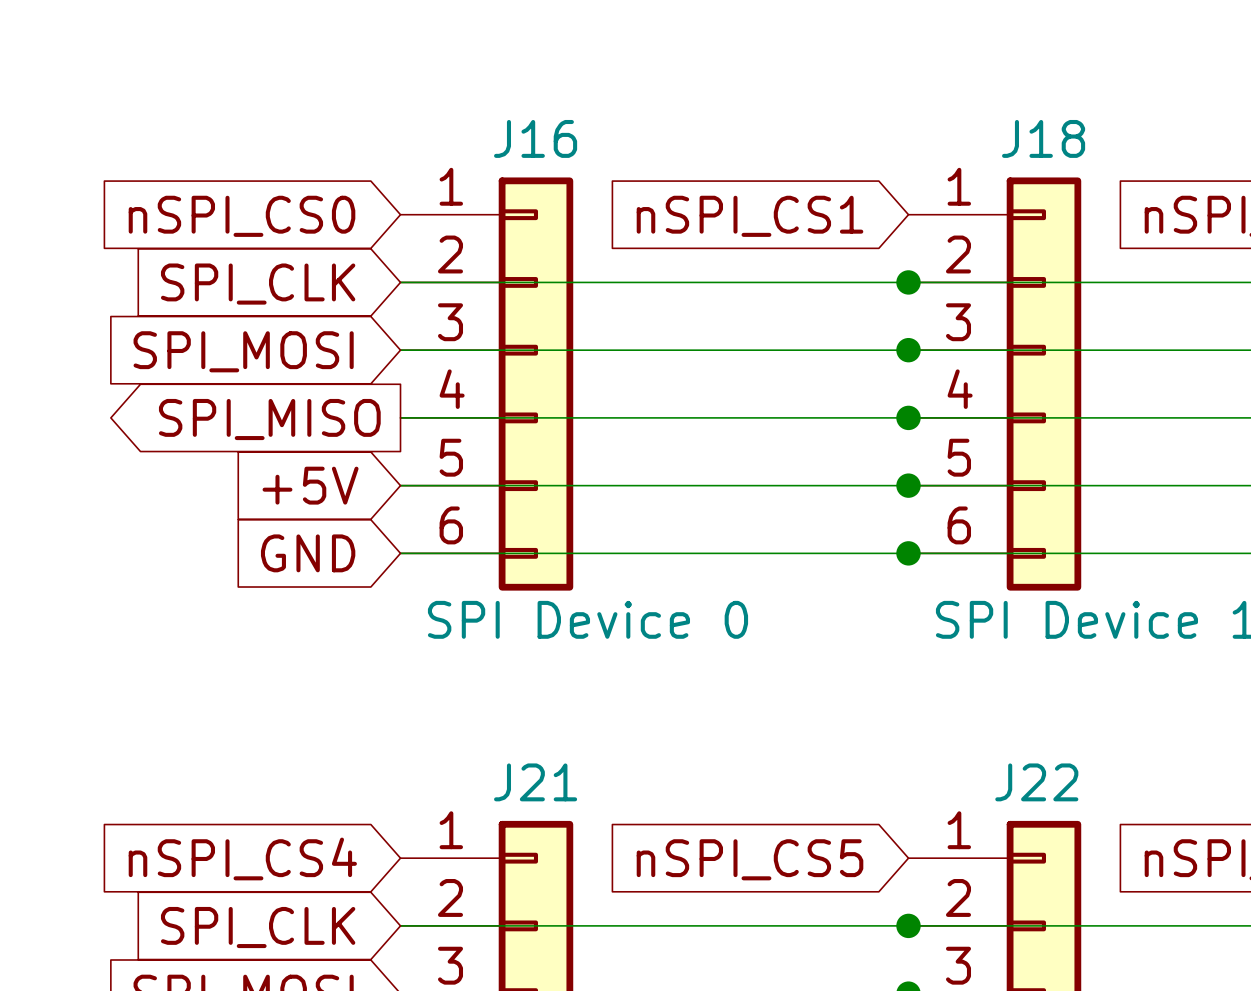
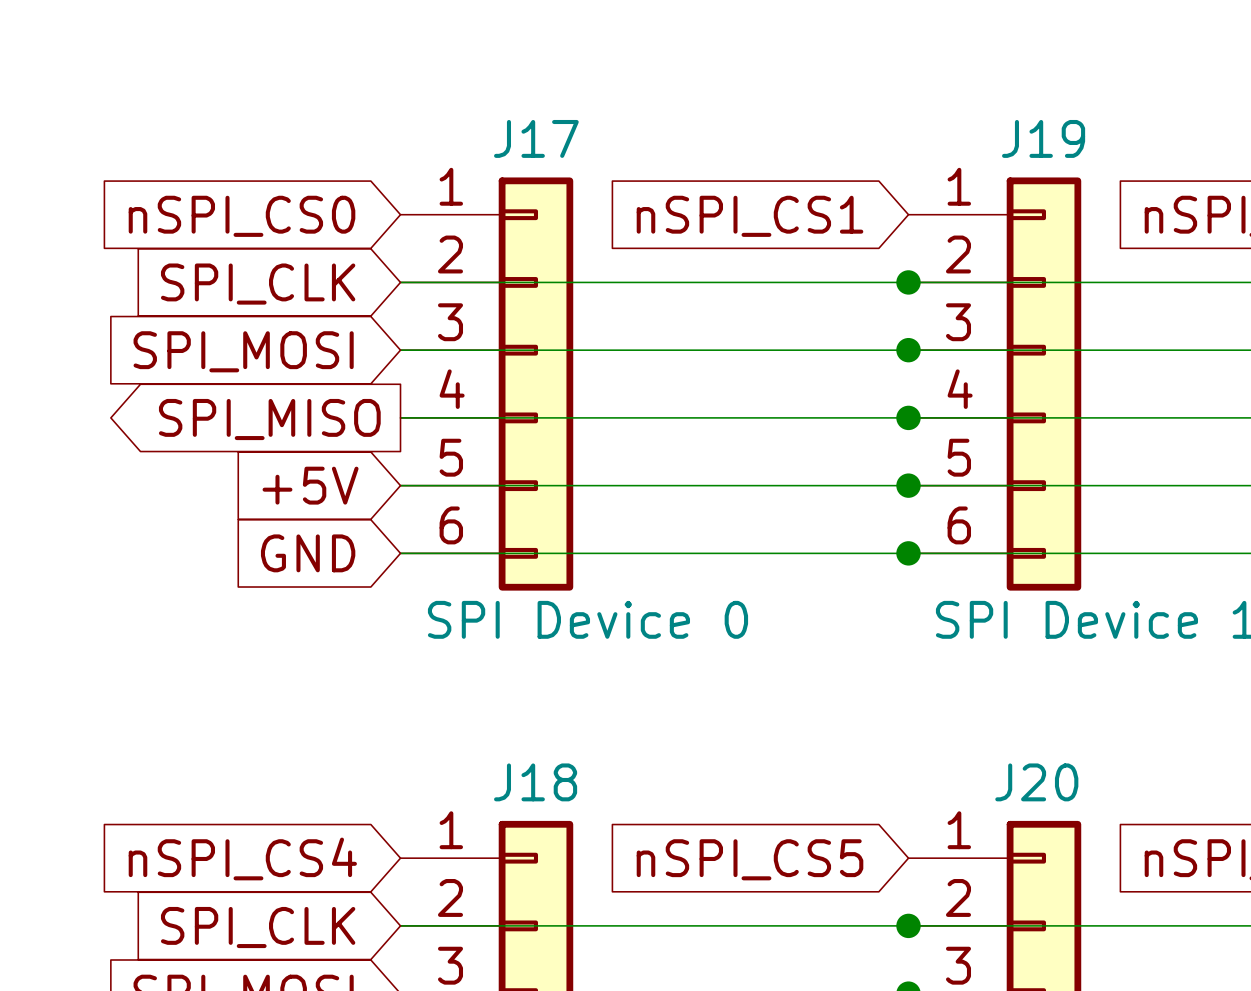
J16 name: J16 (535, 138) -> J17 (536, 138)
J18 name: J18 (1043, 138) -> J19 (1043, 138)
J21 name: J21 (535, 782) -> J18 (535, 782)
J22 name: J22 (1036, 782) -> J20 (1036, 782)

